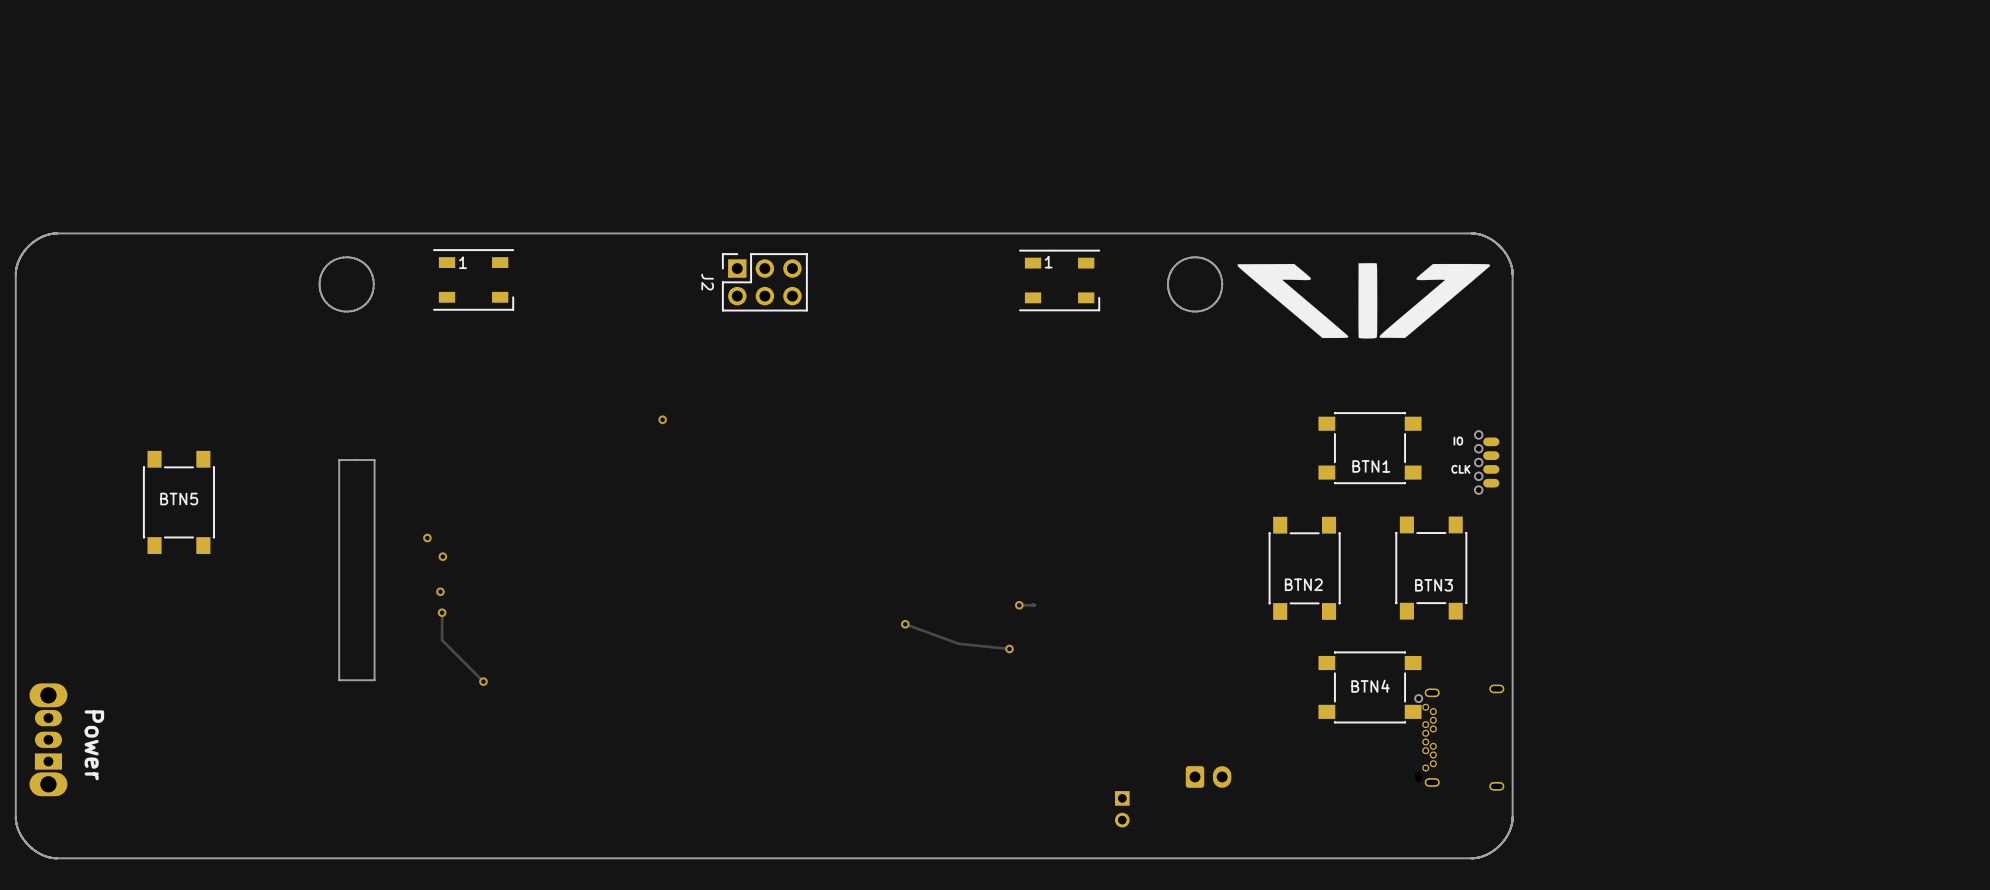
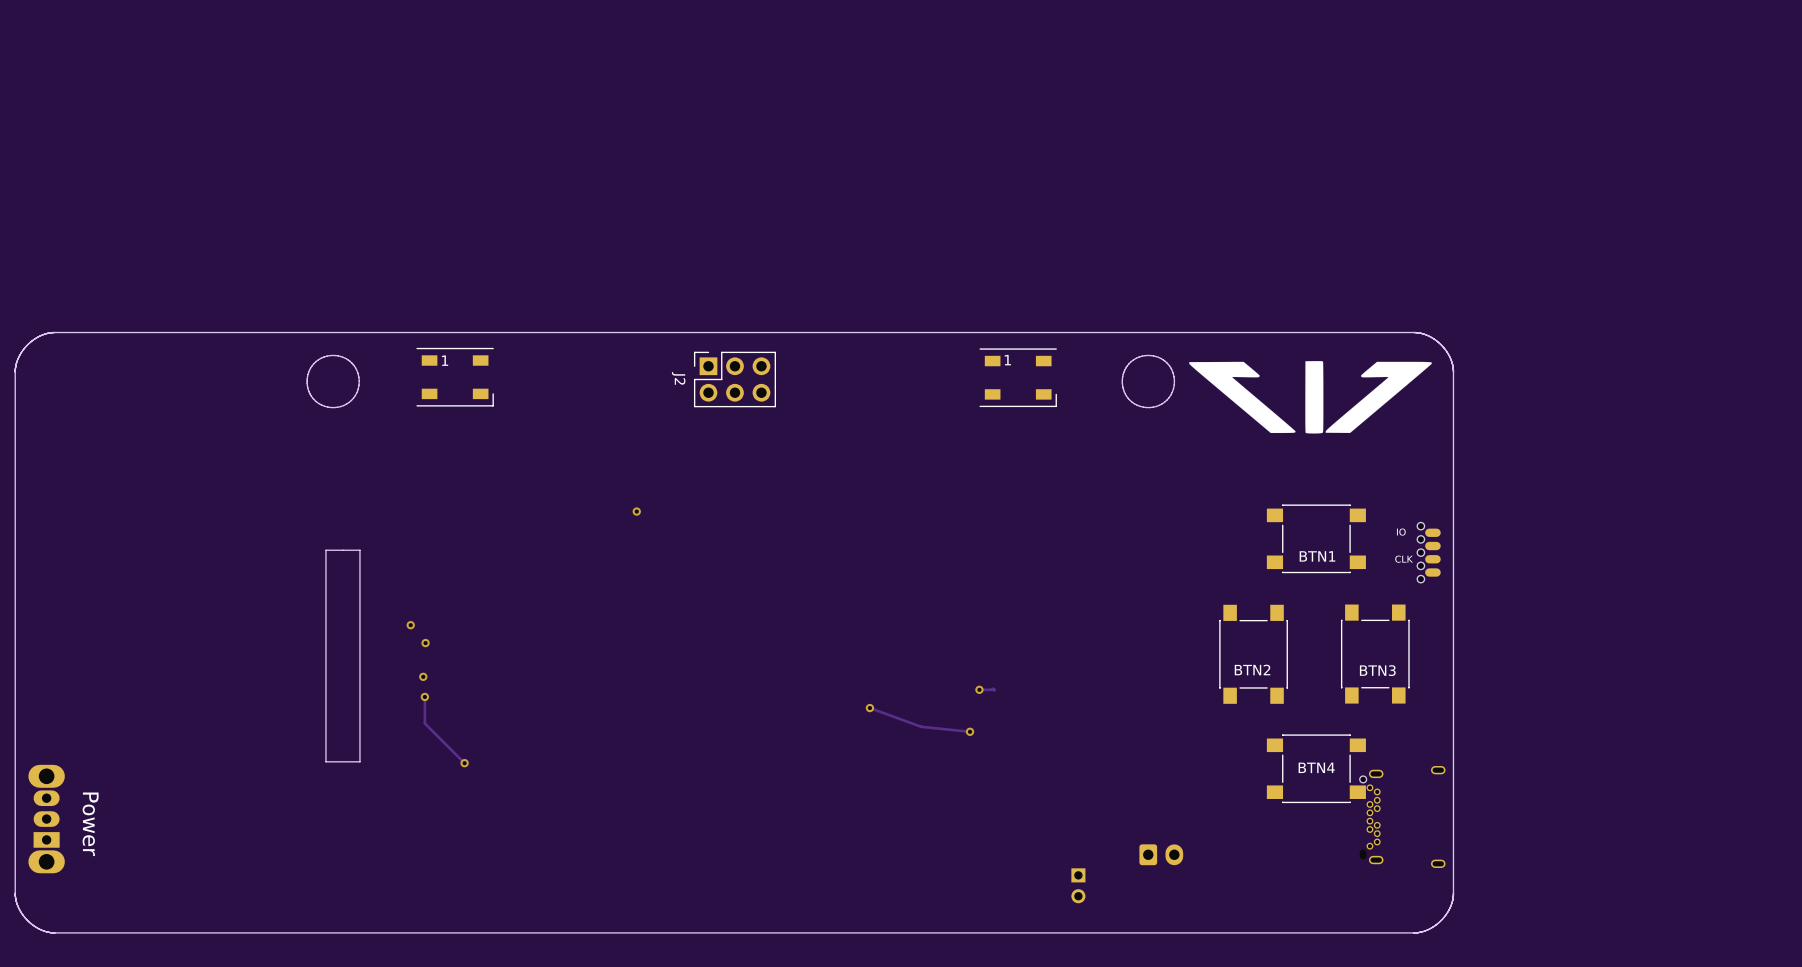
BTN5: (178, 502) -> none

